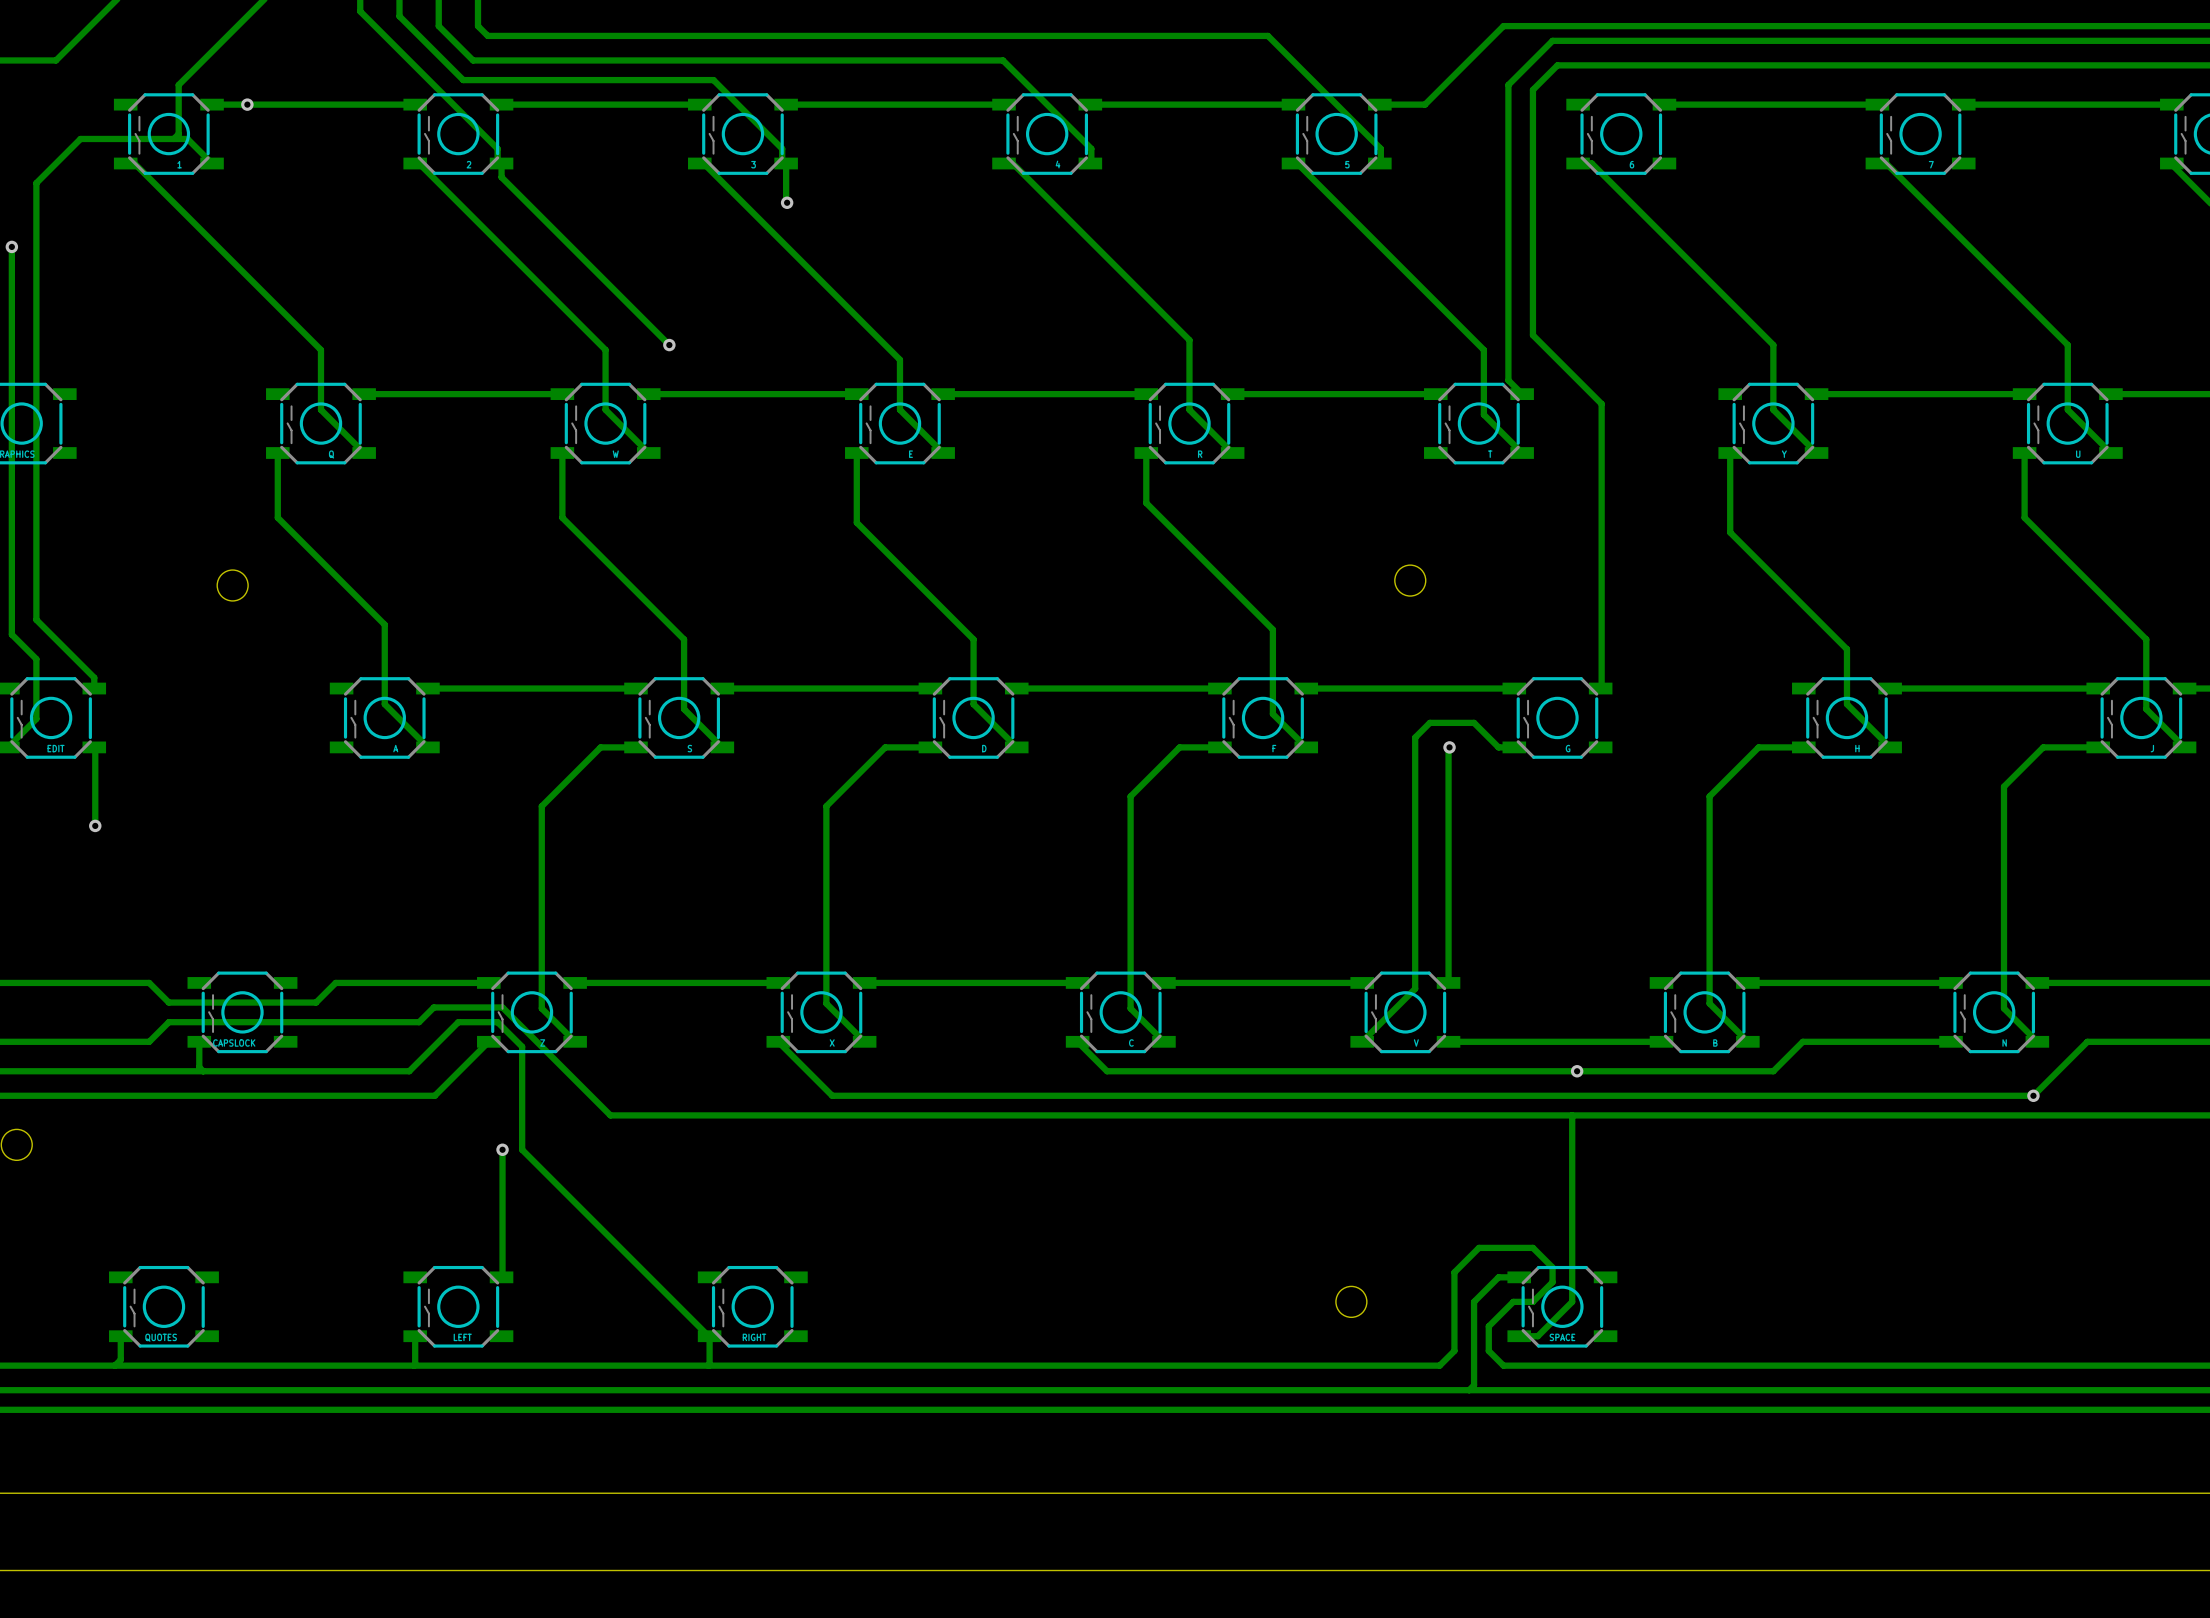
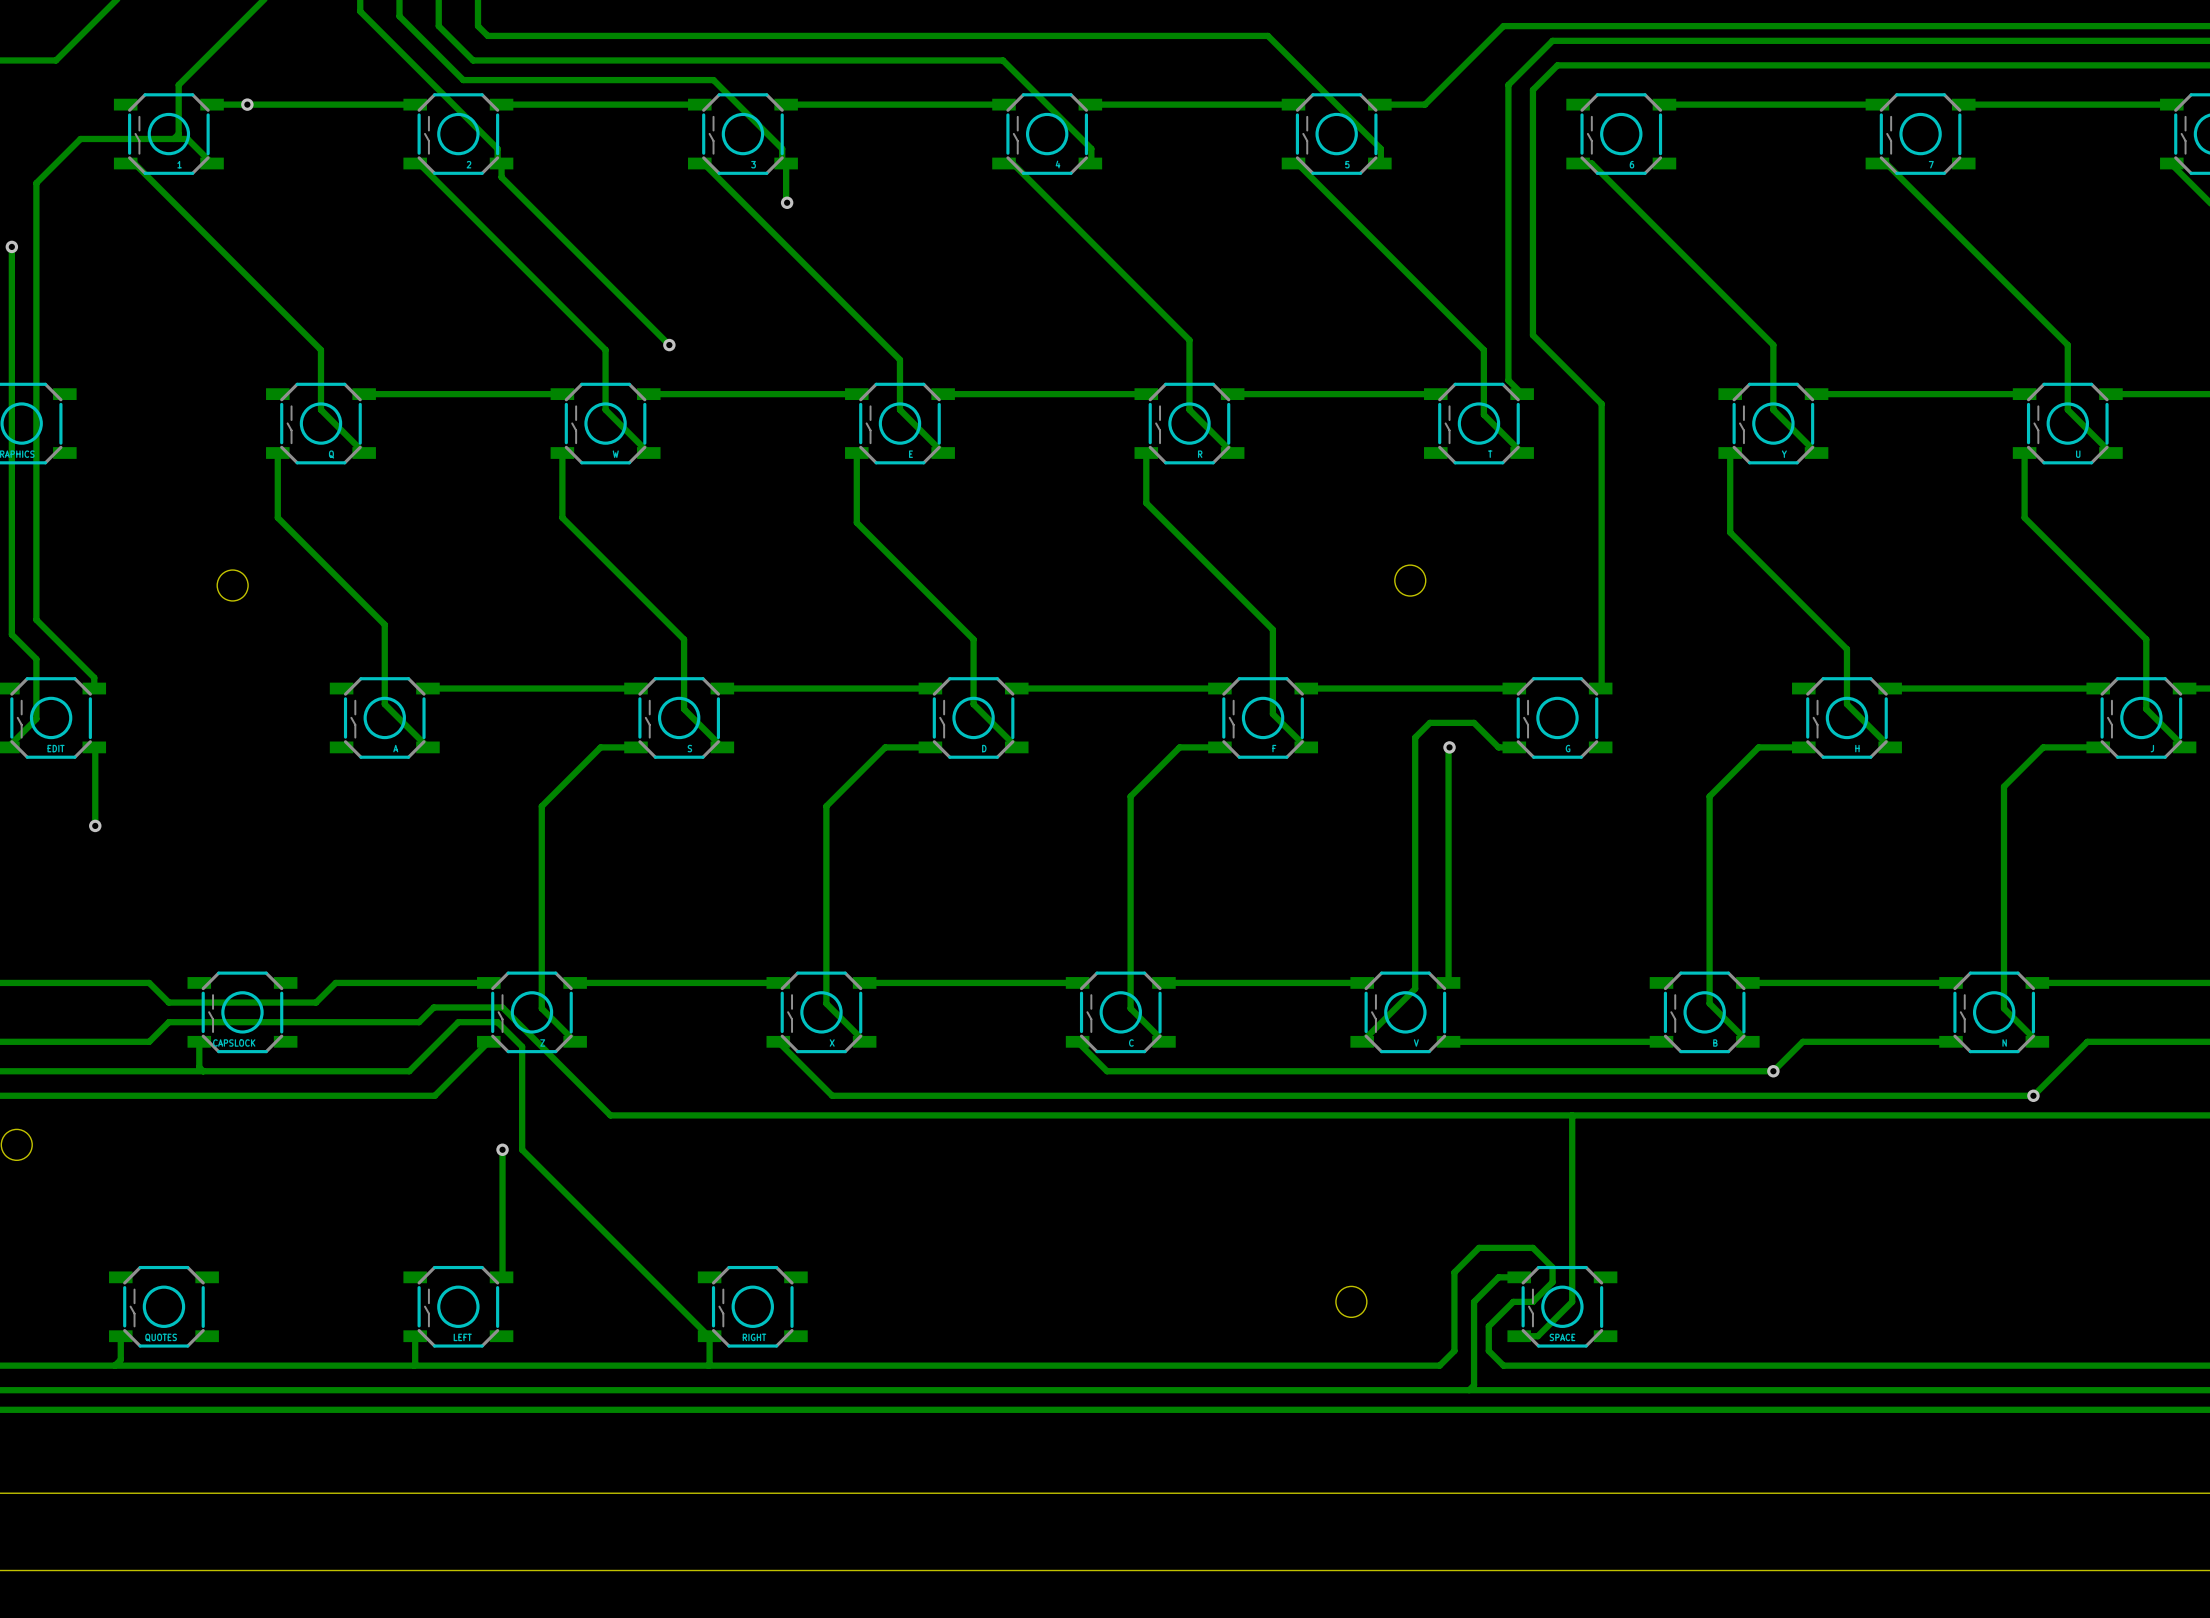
via: (1577, 1071) -> none
via: none -> (1773, 1071)

